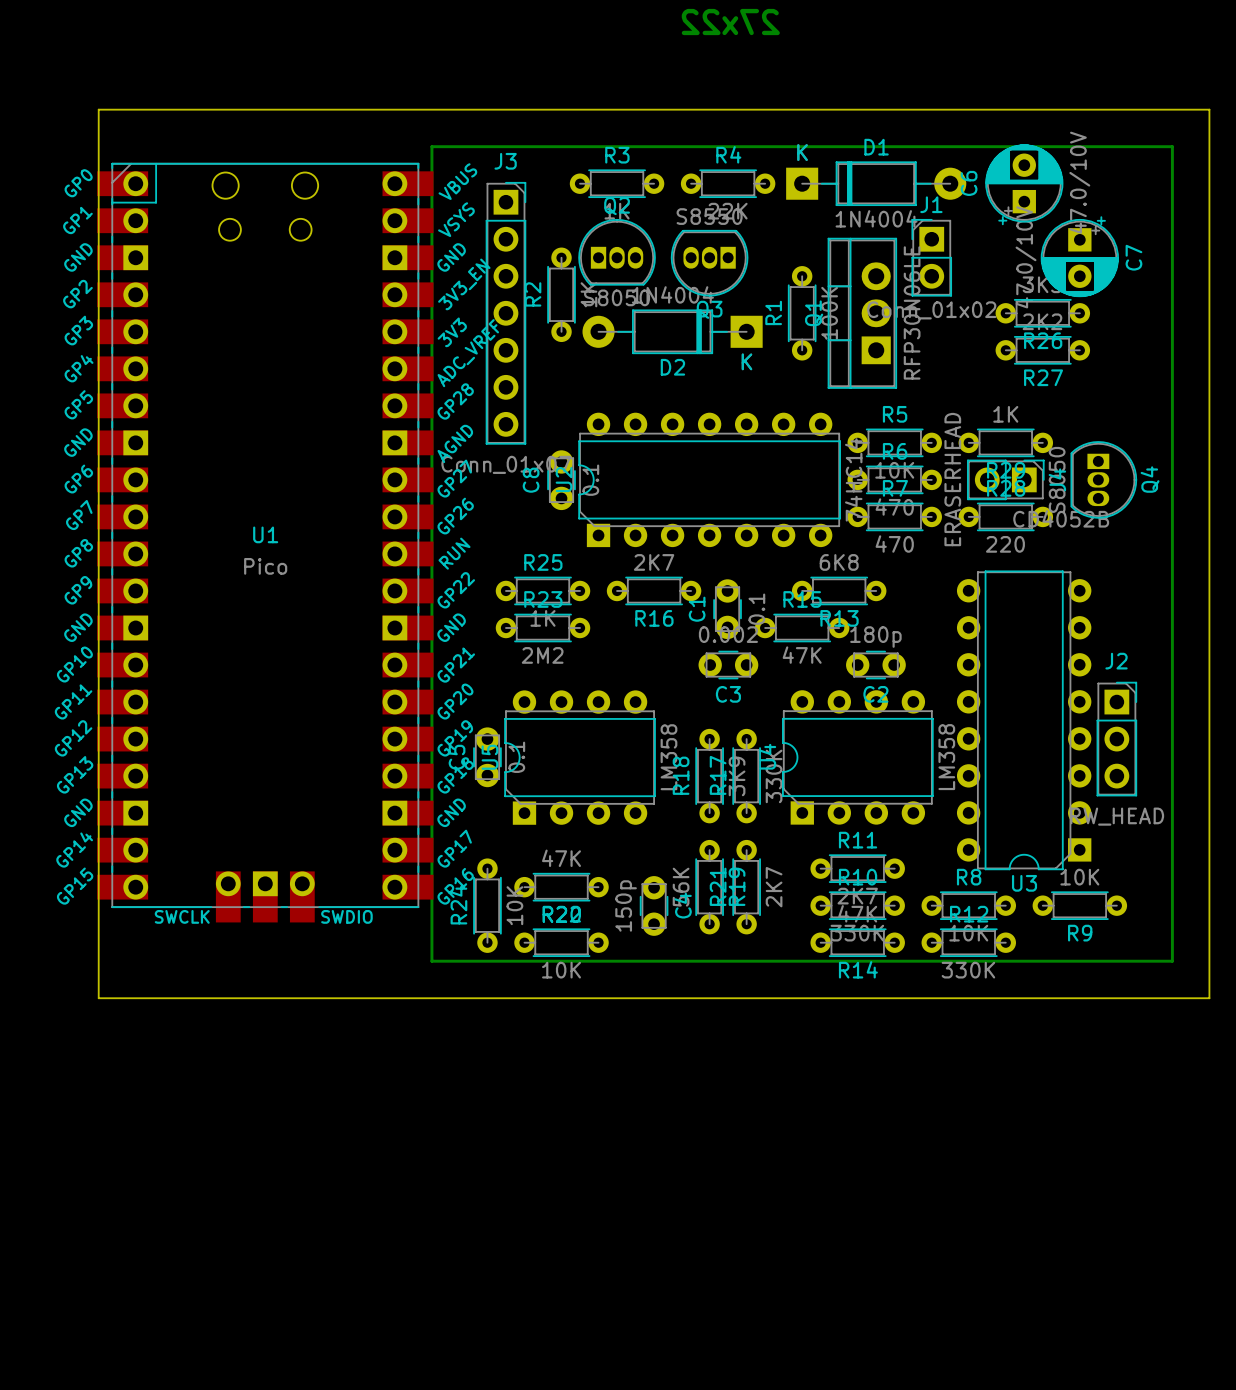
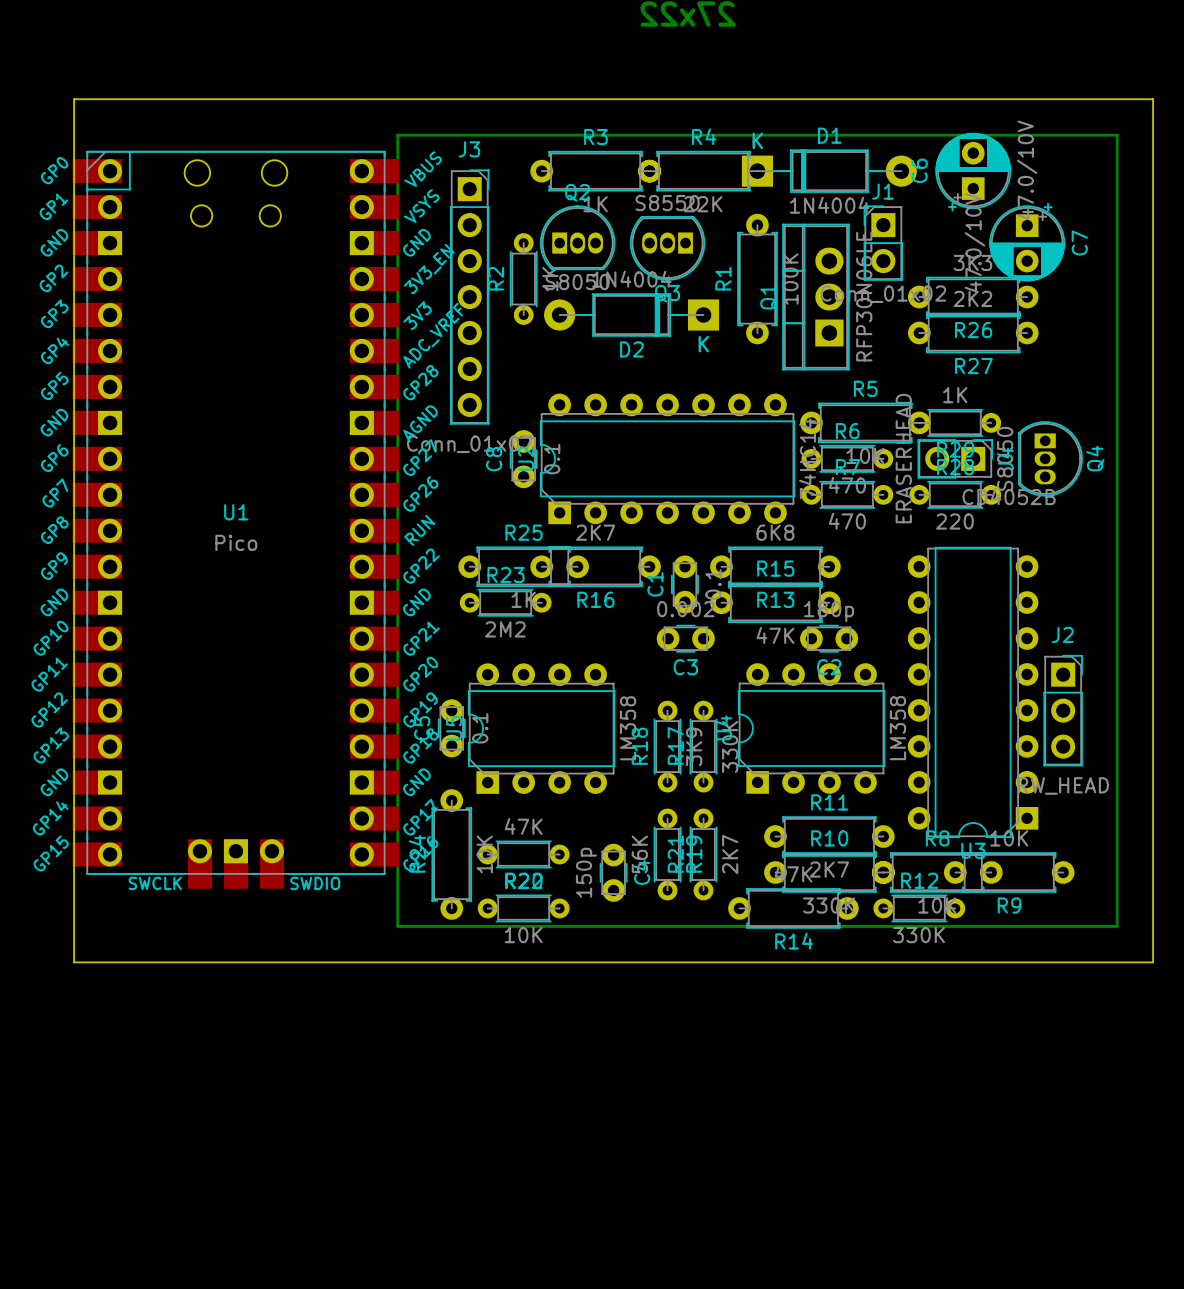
R3 footprint: [569, 169, 665, 199] -> [530, 150, 661, 192]
R4 footprint: [680, 169, 776, 199] -> [638, 150, 769, 192]
R1 footprint: [787, 266, 817, 361] -> [737, 213, 778, 345]
R26 footprint: [995, 299, 1091, 328] -> [907, 276, 1039, 318]
R27 footprint: [995, 336, 1091, 365] -> [907, 312, 1039, 354]
R5 footprint: [847, 428, 942, 458] -> [800, 402, 931, 444]
R25 footprint: [495, 576, 591, 606] -> [458, 546, 589, 588]
R16 footprint: [606, 576, 702, 606] -> [530, 546, 661, 588]
R13 footprint: [791, 576, 887, 606] -> [710, 546, 841, 588]
R15 footprint: [754, 613, 850, 643] -> [710, 582, 841, 623]
R11 footprint: [810, 854, 905, 883] -> [764, 816, 895, 857]
R24 footprint: [473, 858, 502, 953] -> [431, 789, 473, 920]
R10 footprint: [810, 891, 905, 920] -> [764, 852, 895, 893]
R8 footprint: [921, 891, 1017, 920] -> [872, 852, 1003, 893]
R9 footprint: [1032, 891, 1128, 920] -> [943, 852, 1075, 893]
R14 footprint: [810, 928, 905, 957] -> [728, 888, 859, 929]

